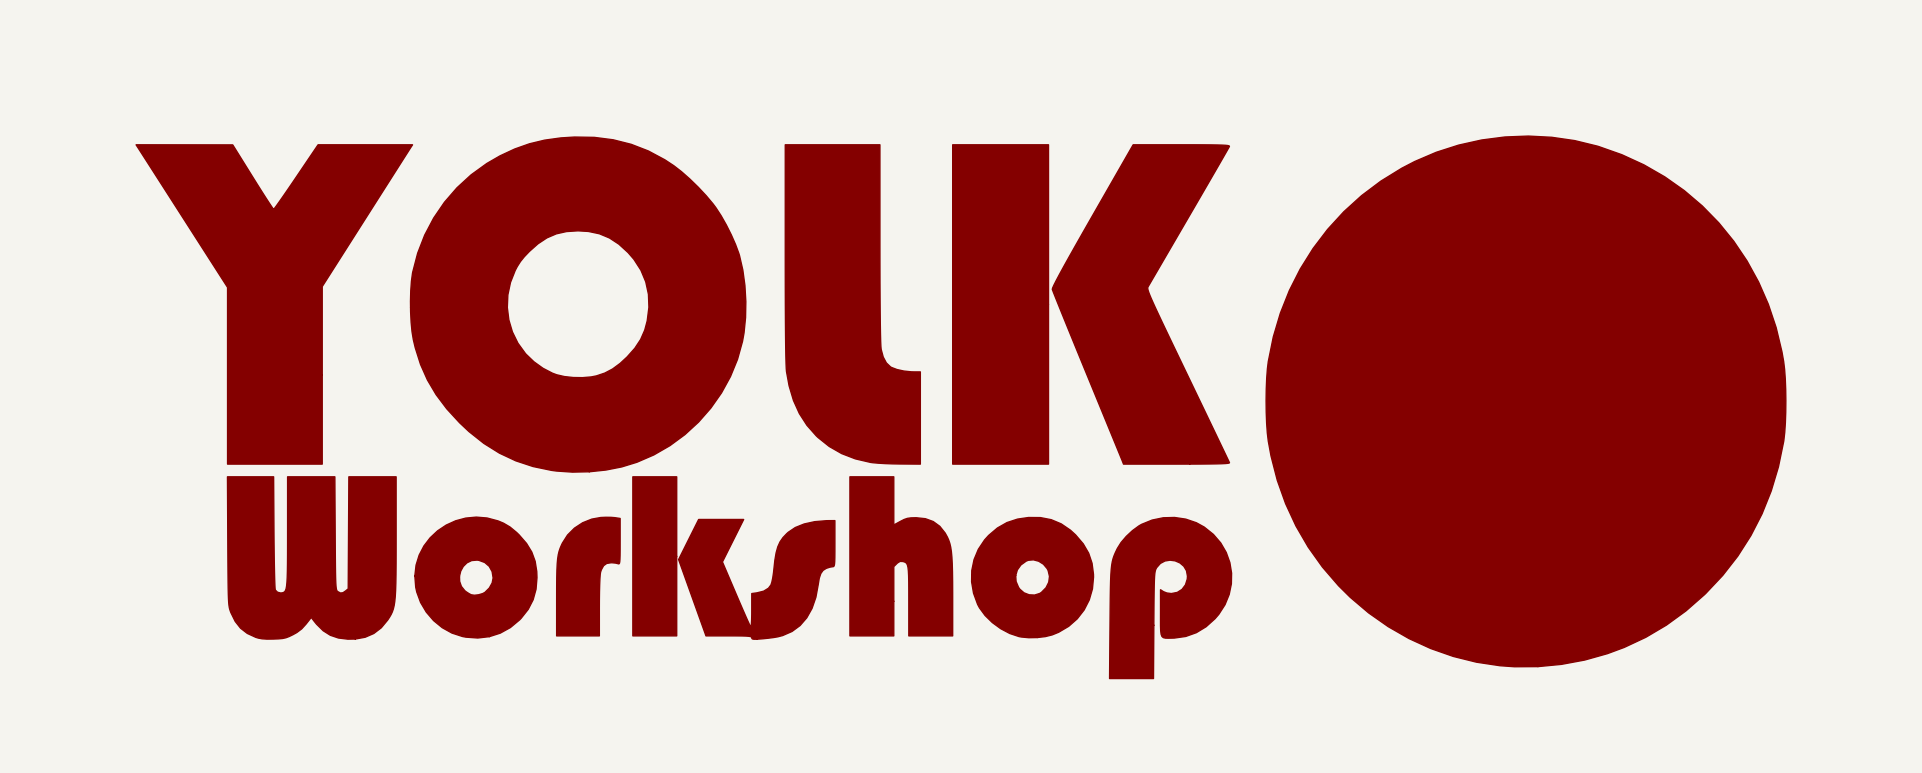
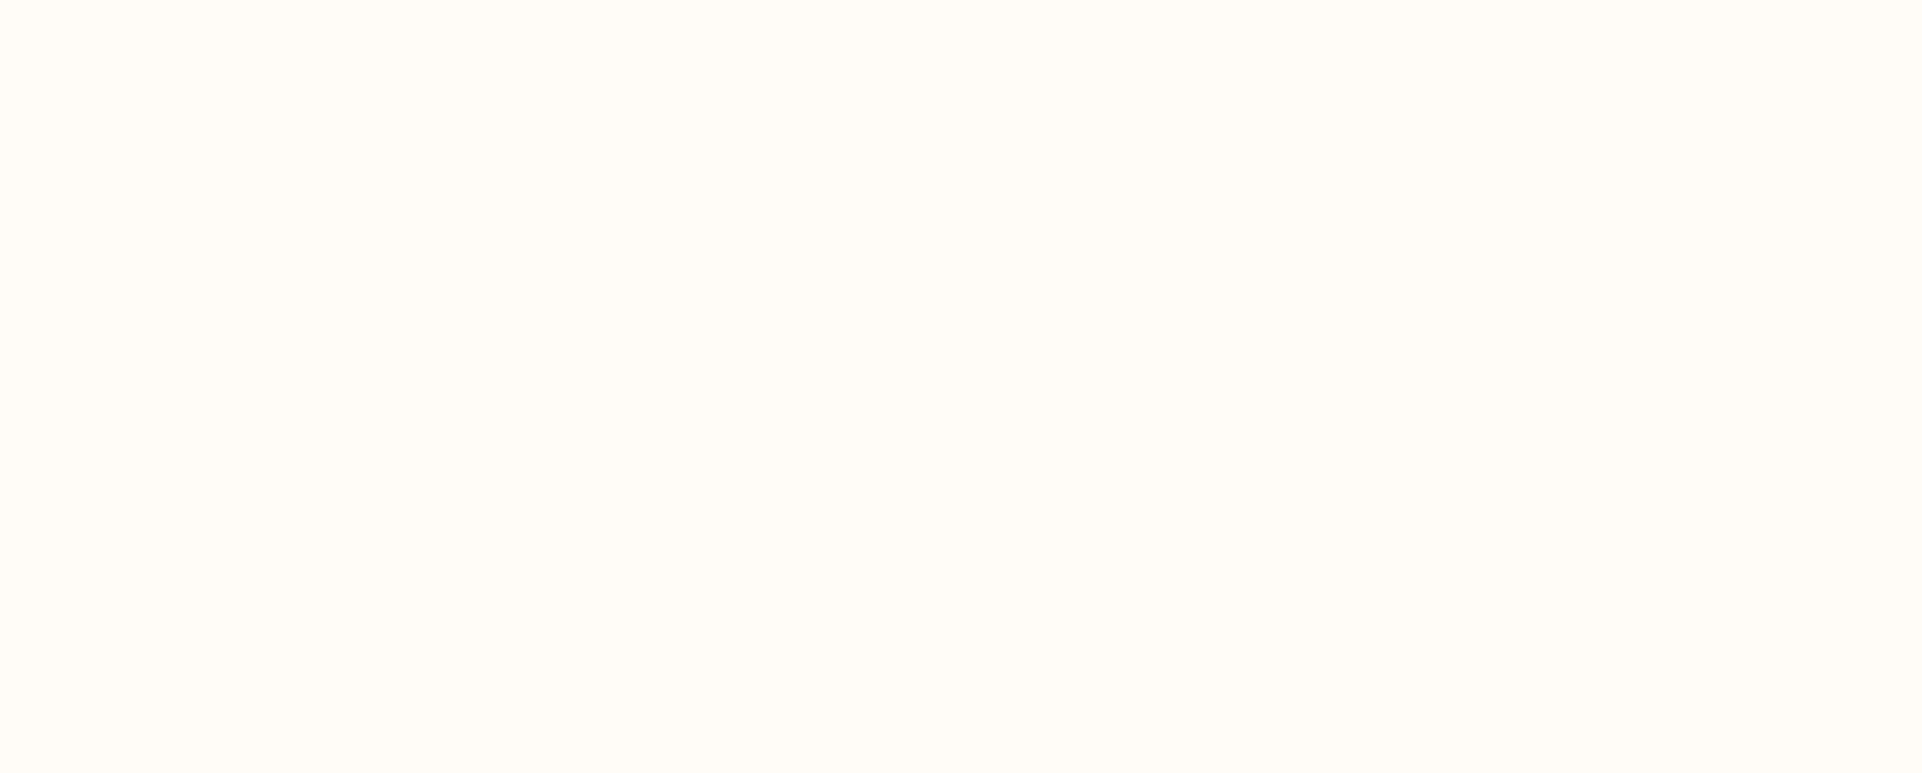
power symbol: (960, 407) -> none

